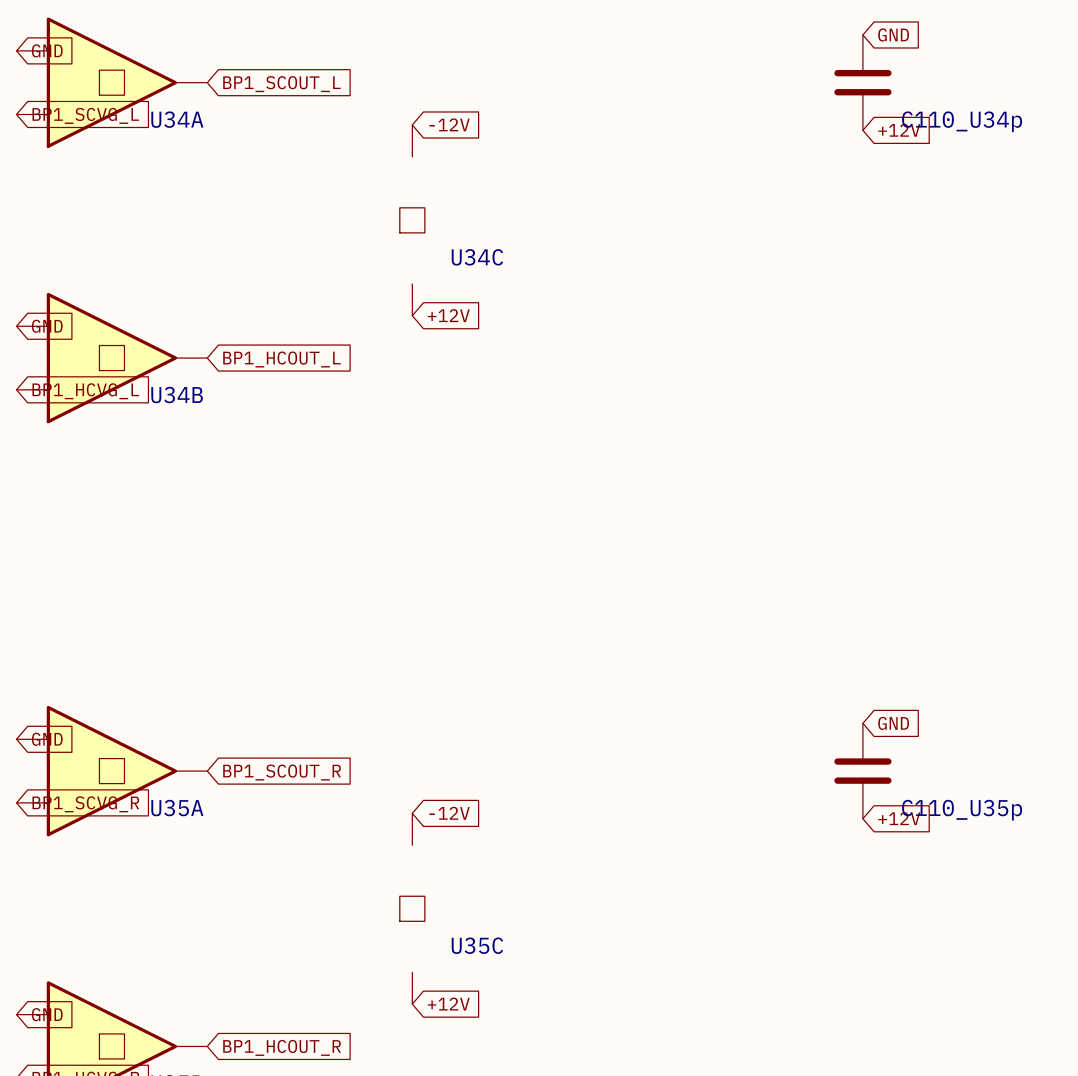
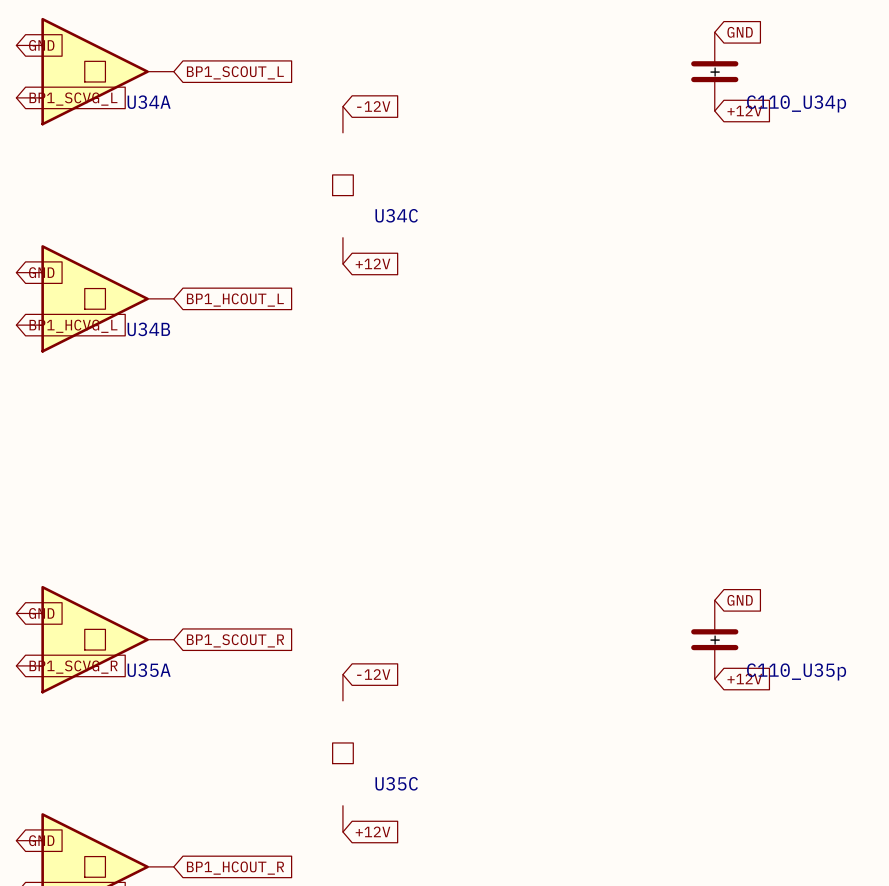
C110_U34p pin name: none -> + (715, 72)
C110_U35p pin name: none -> + (715, 640)

